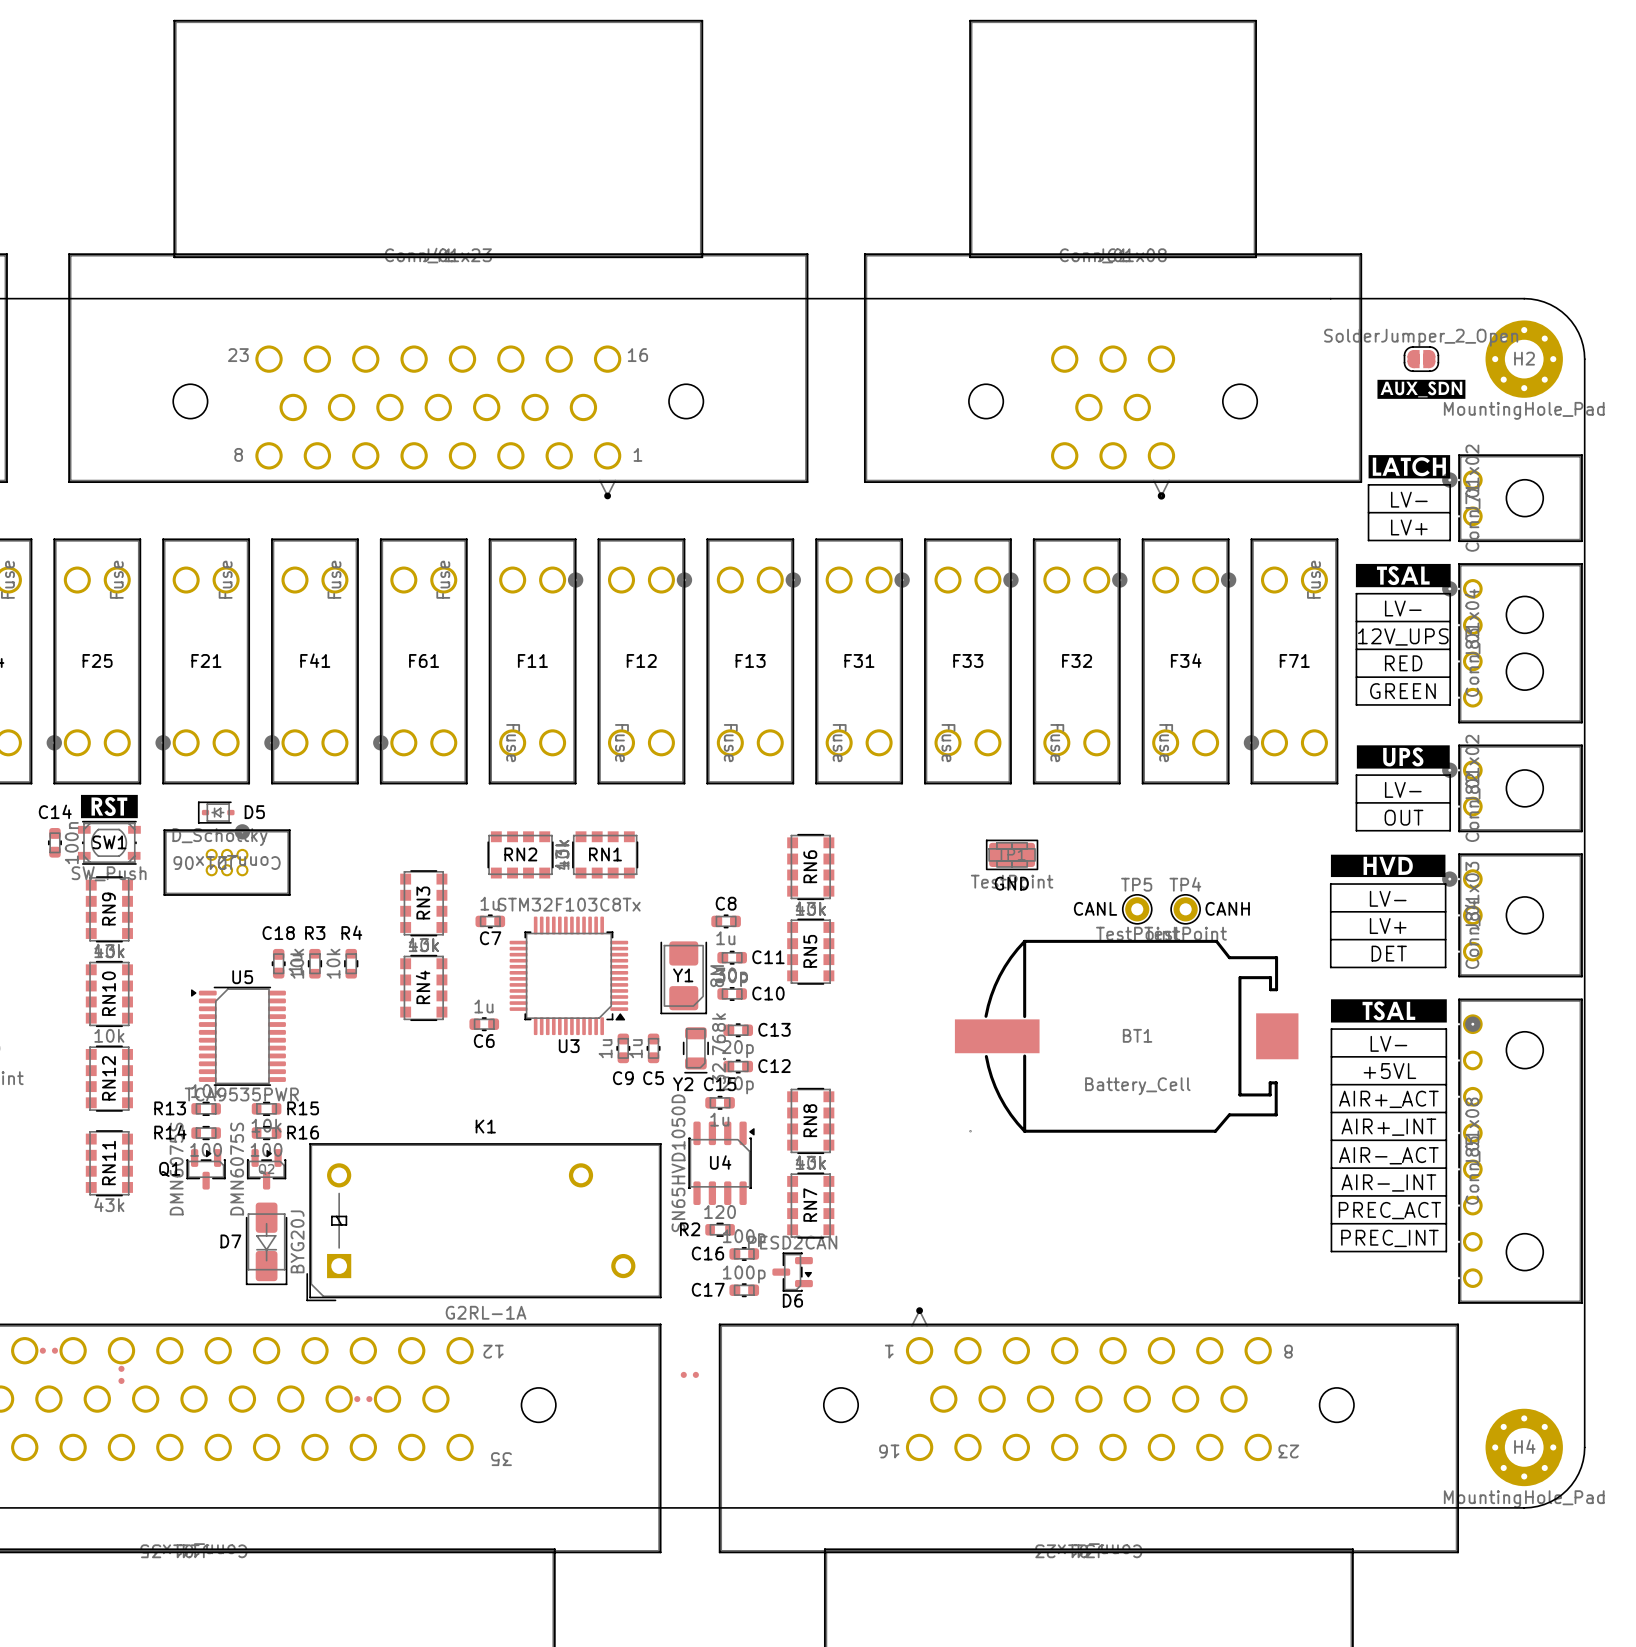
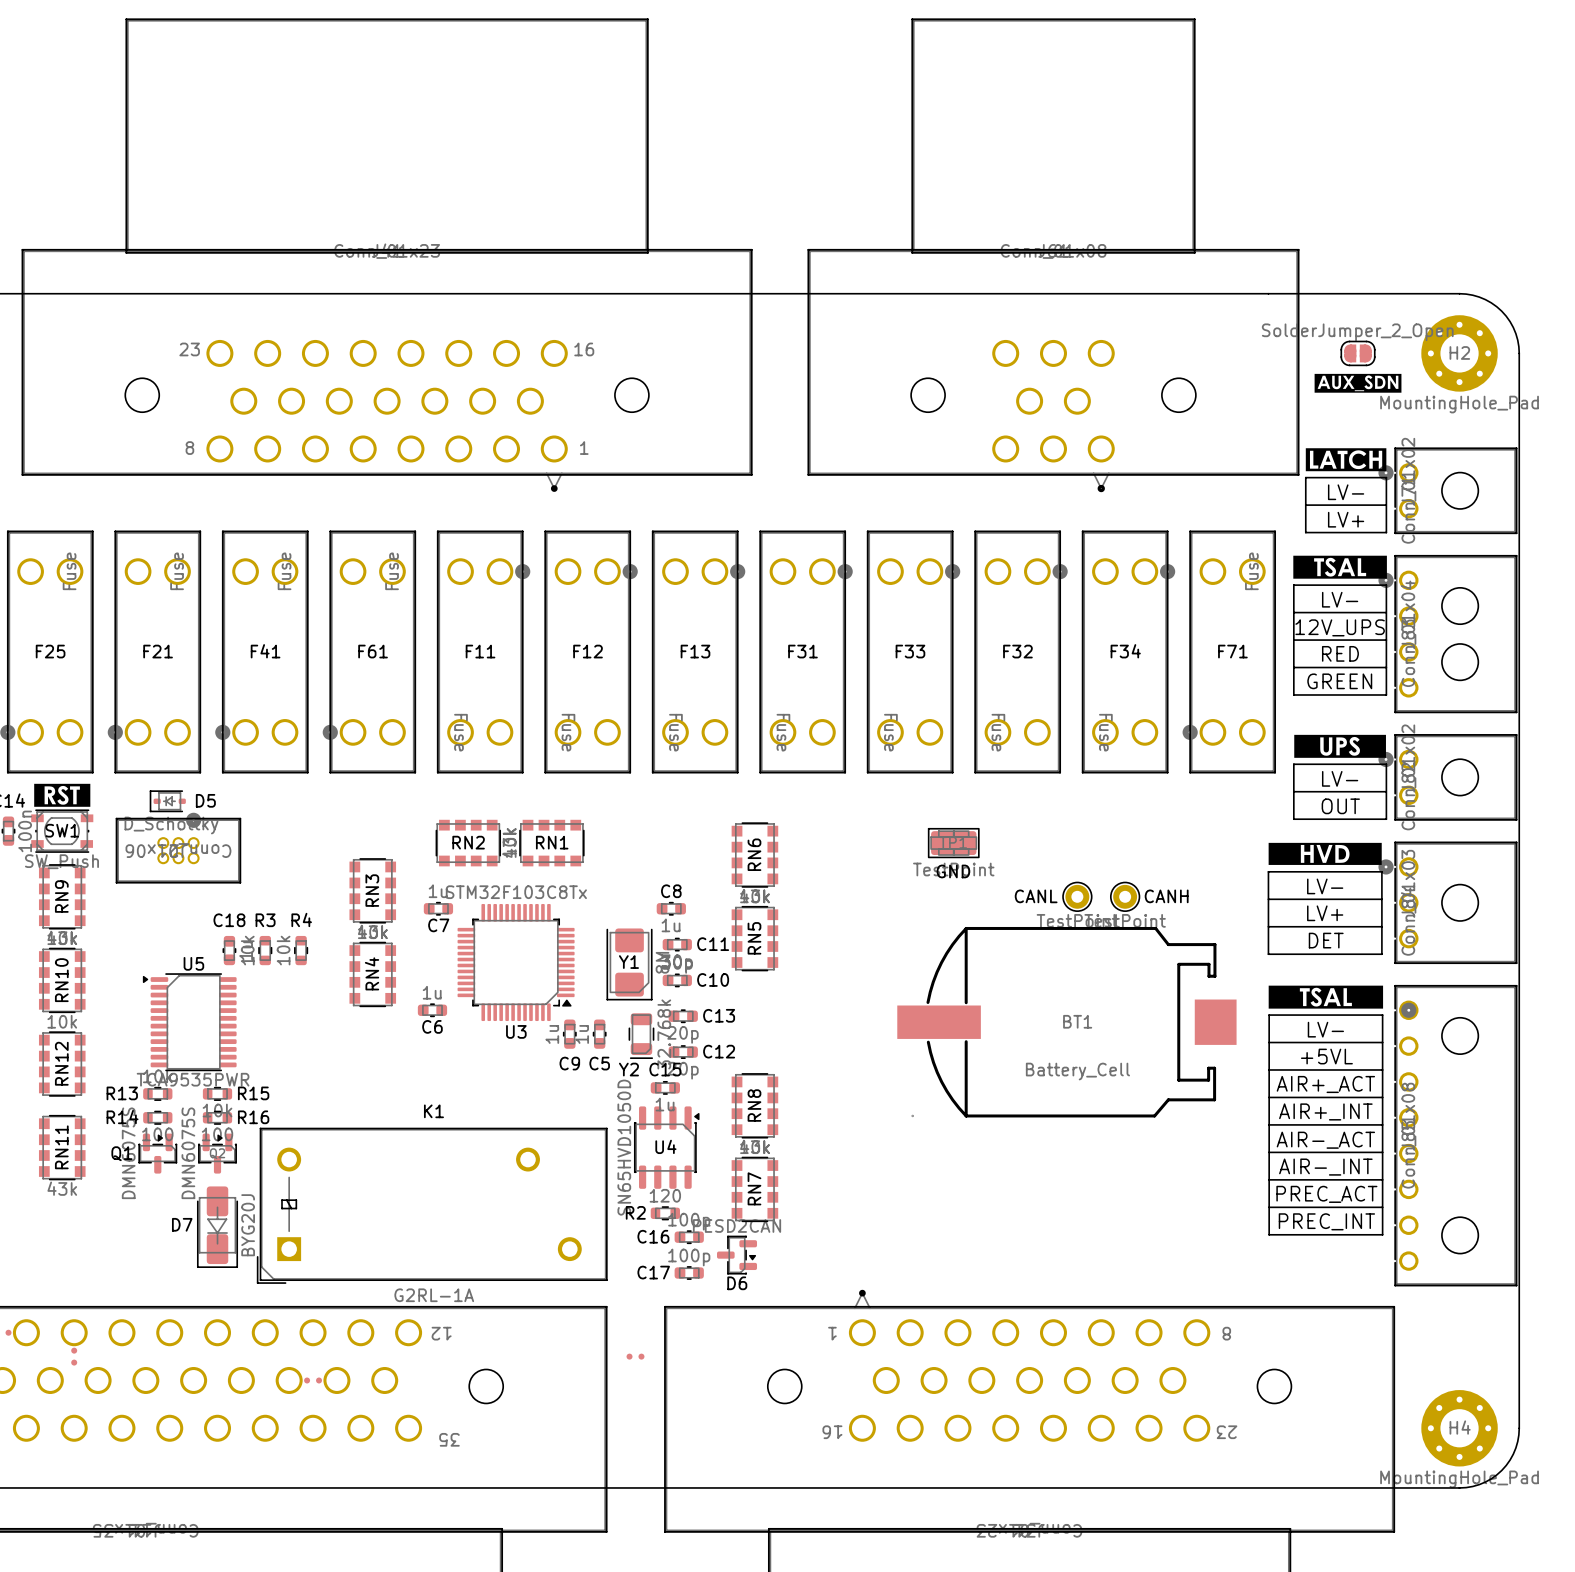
TP5 name: TP5 (1136, 884) -> CANL (1036, 896)
TP4 name: TP4 (1185, 884) -> CANH (1166, 896)

